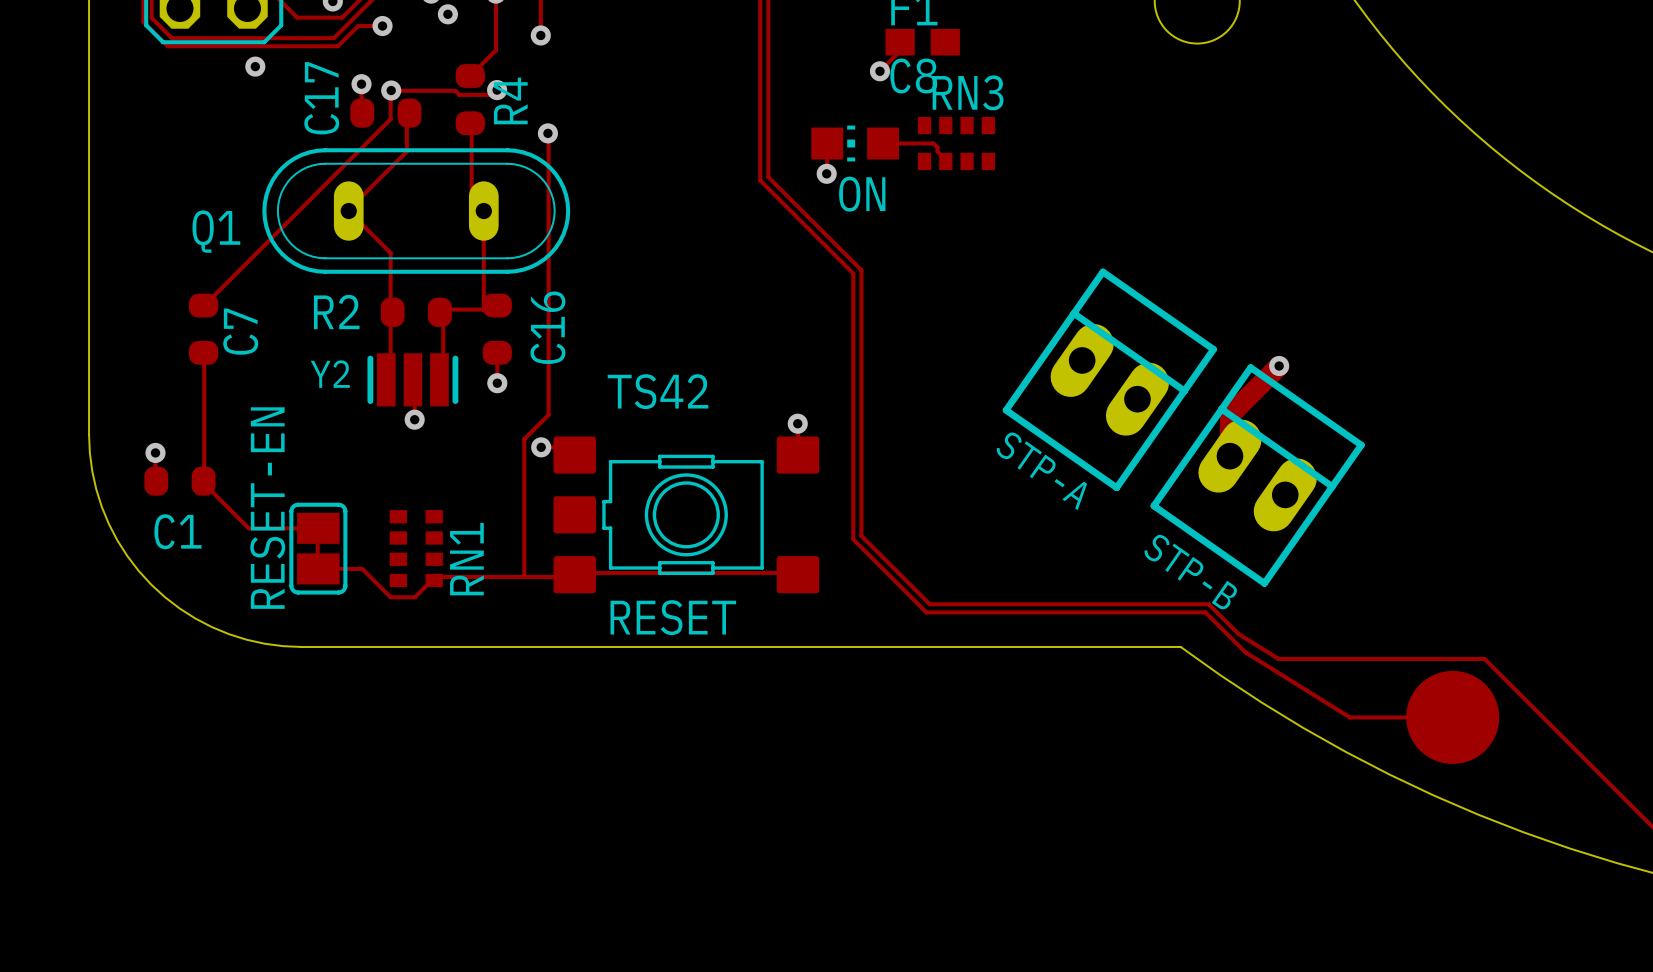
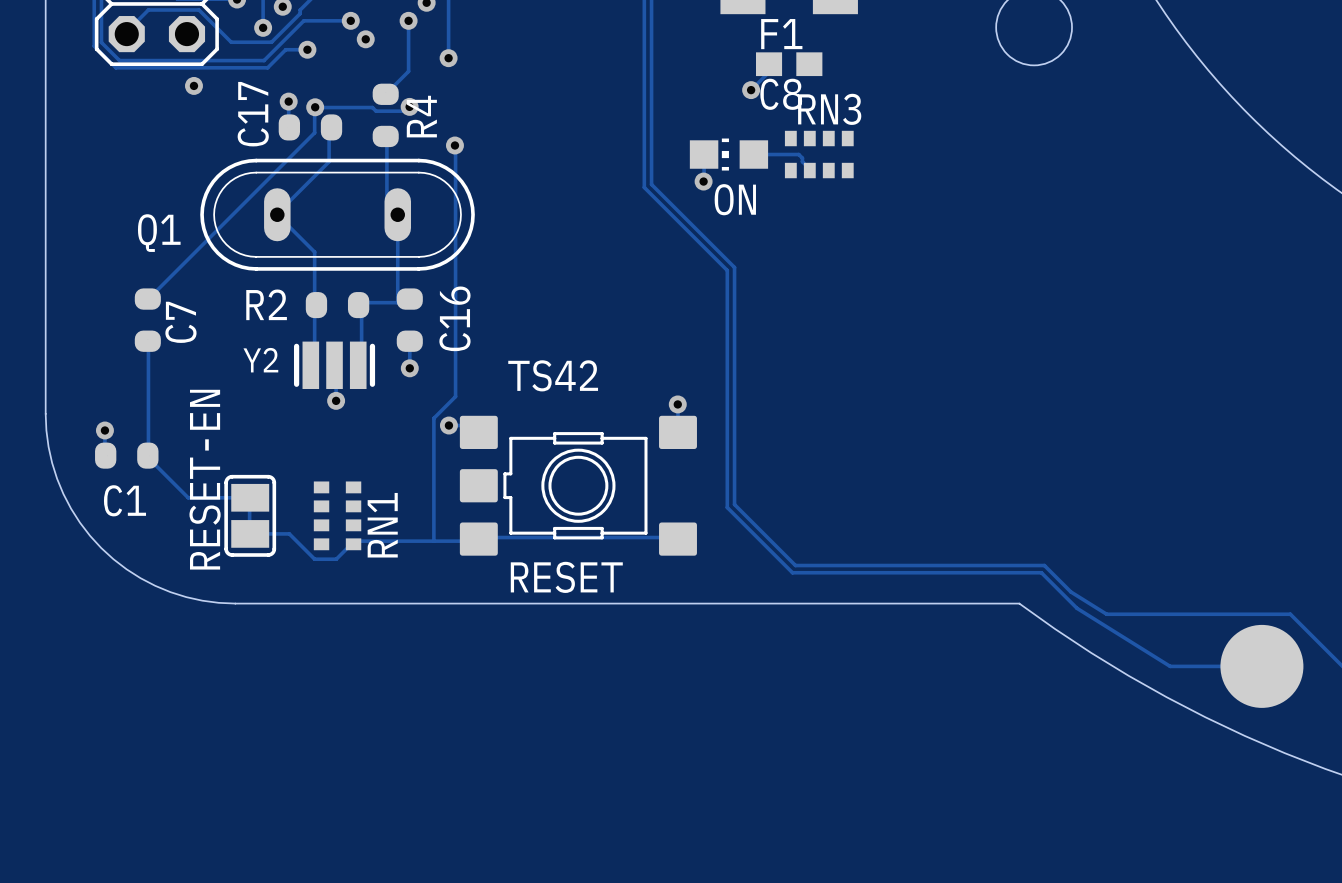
track: (1279, 366) (1229, 415) (1229, 456) -> none
via: (1279, 366) -> none
STP-A: (1109, 379) -> none
STP-B: (1257, 475) -> none

